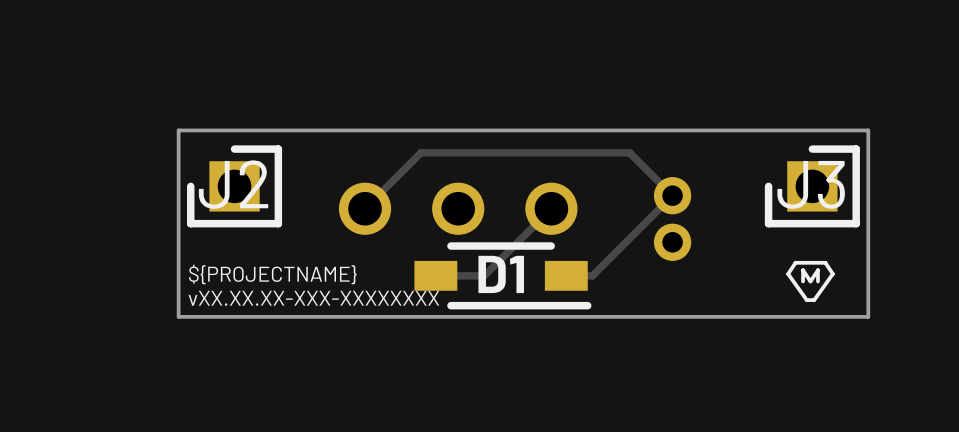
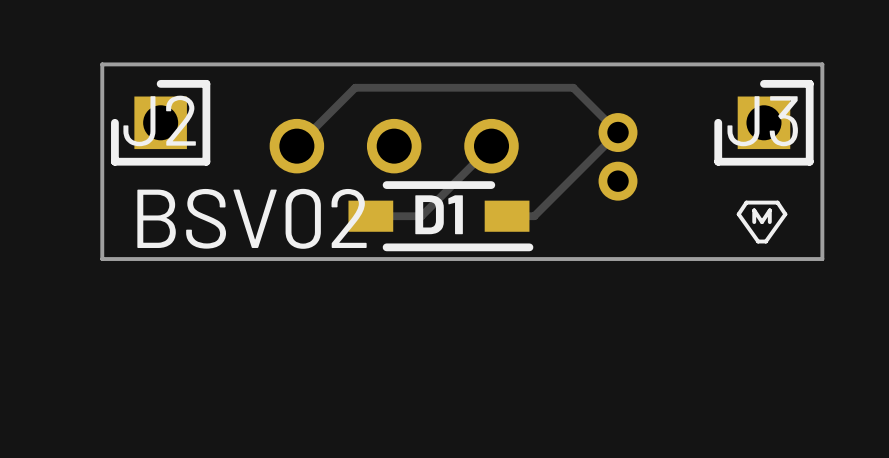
text: ${PROJECTNAME} (272, 274) -> none
text: none -> BSV02 (252, 218)
text: vXX.XX.XX-XXX-XXXXXXXX (313, 298) -> none

